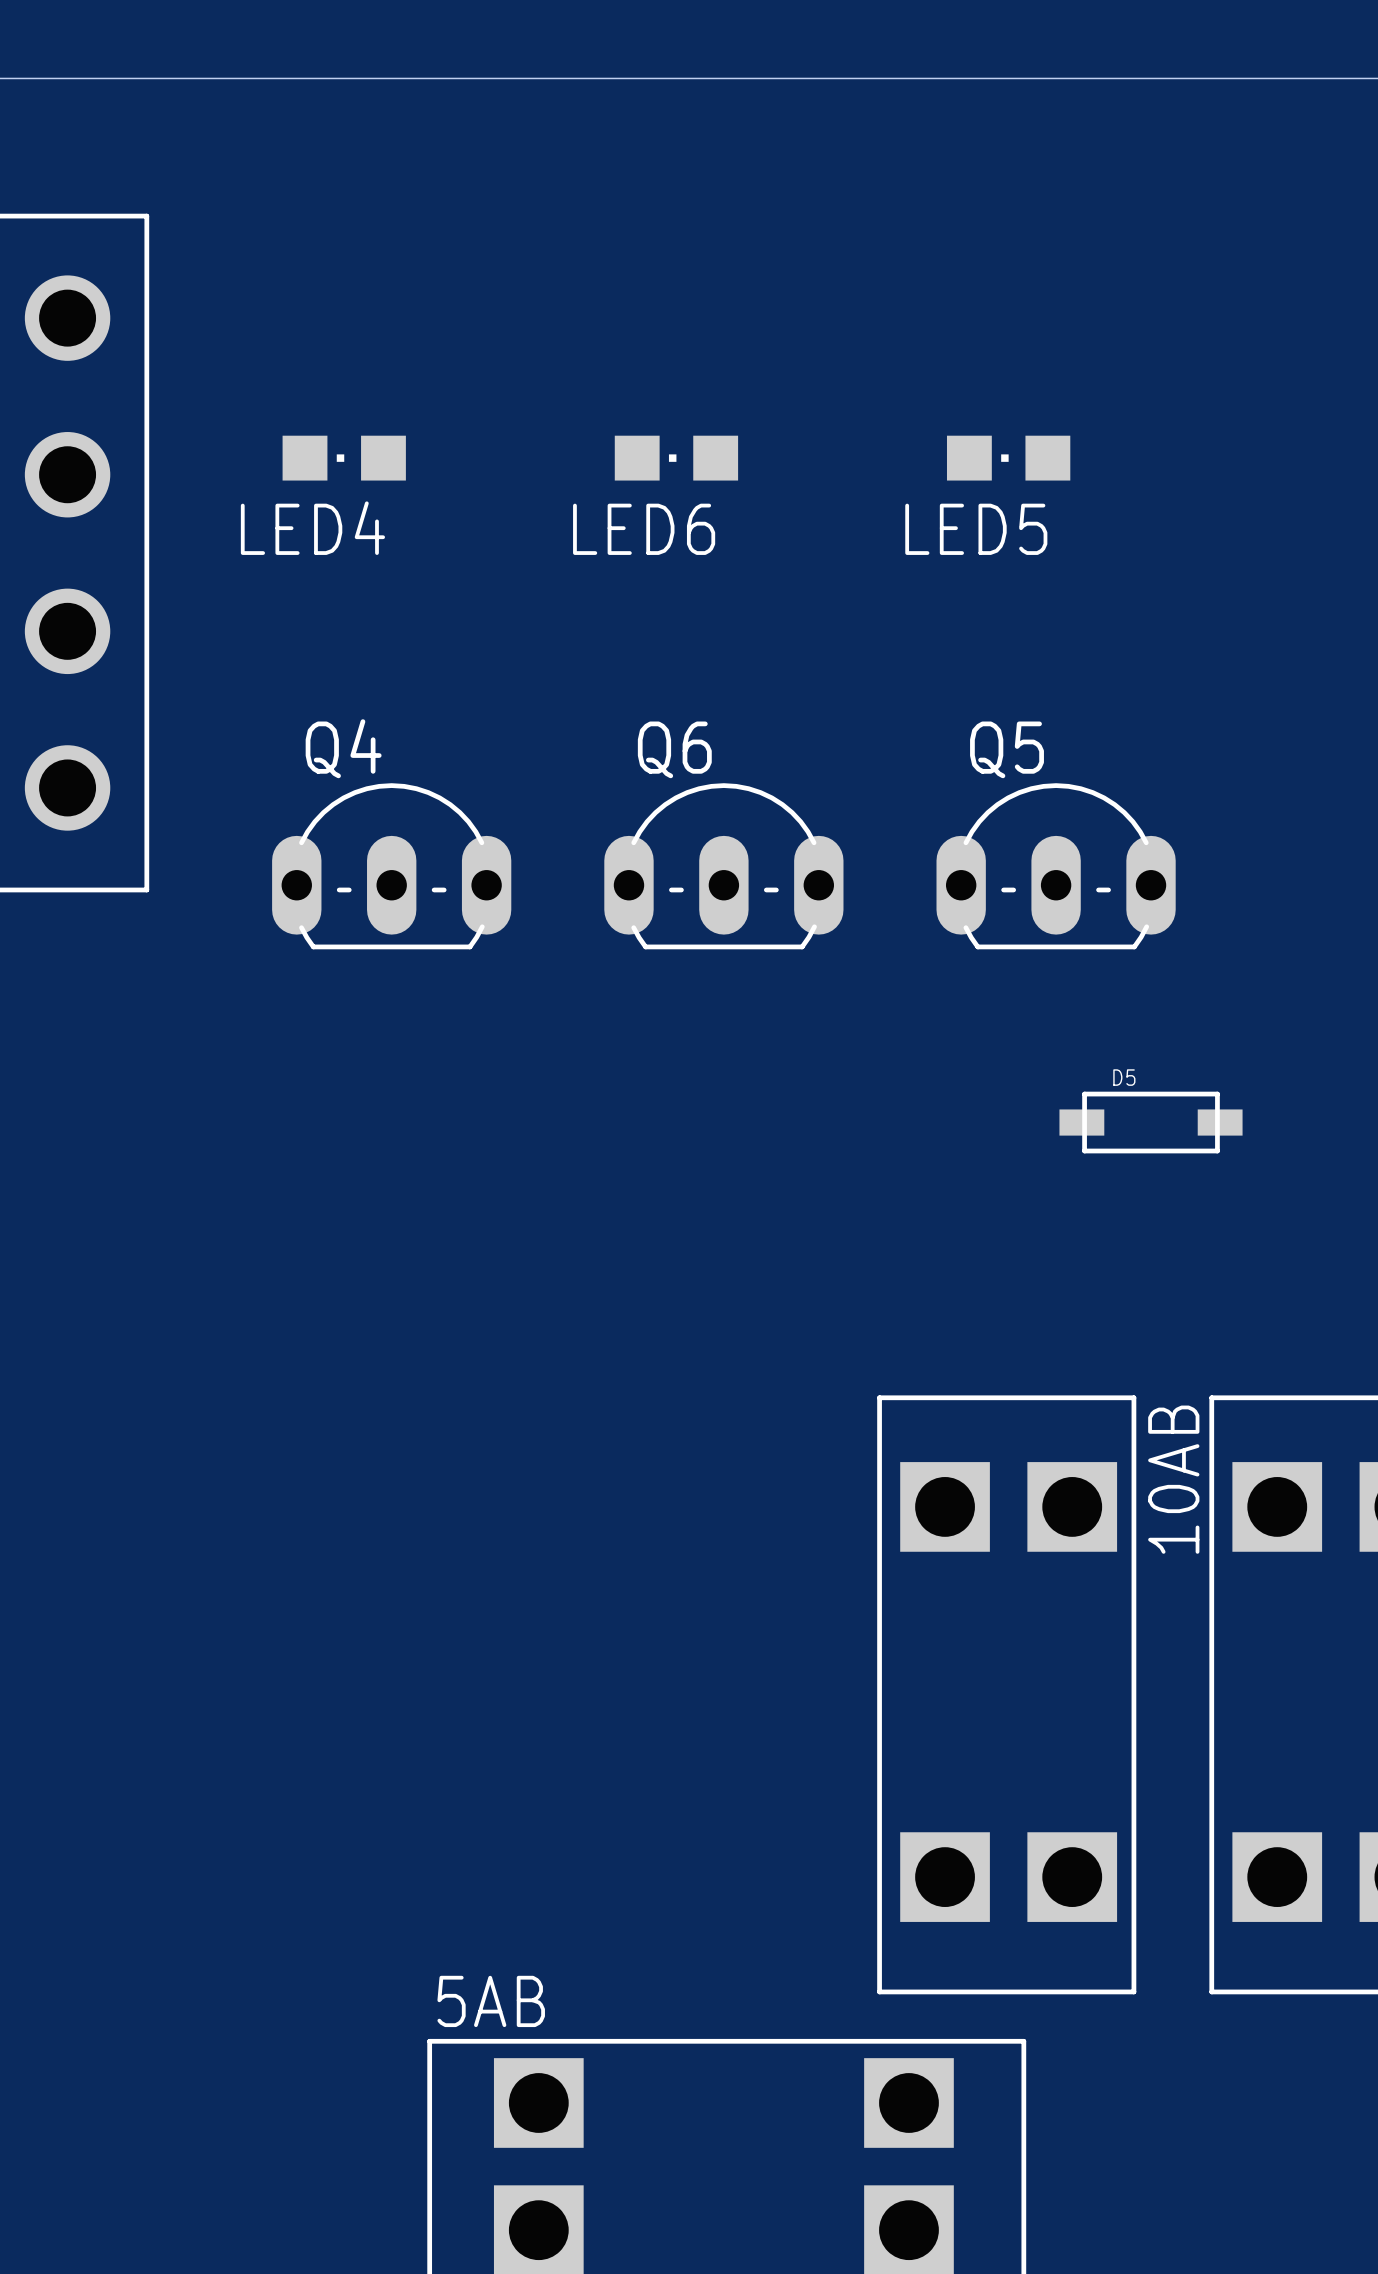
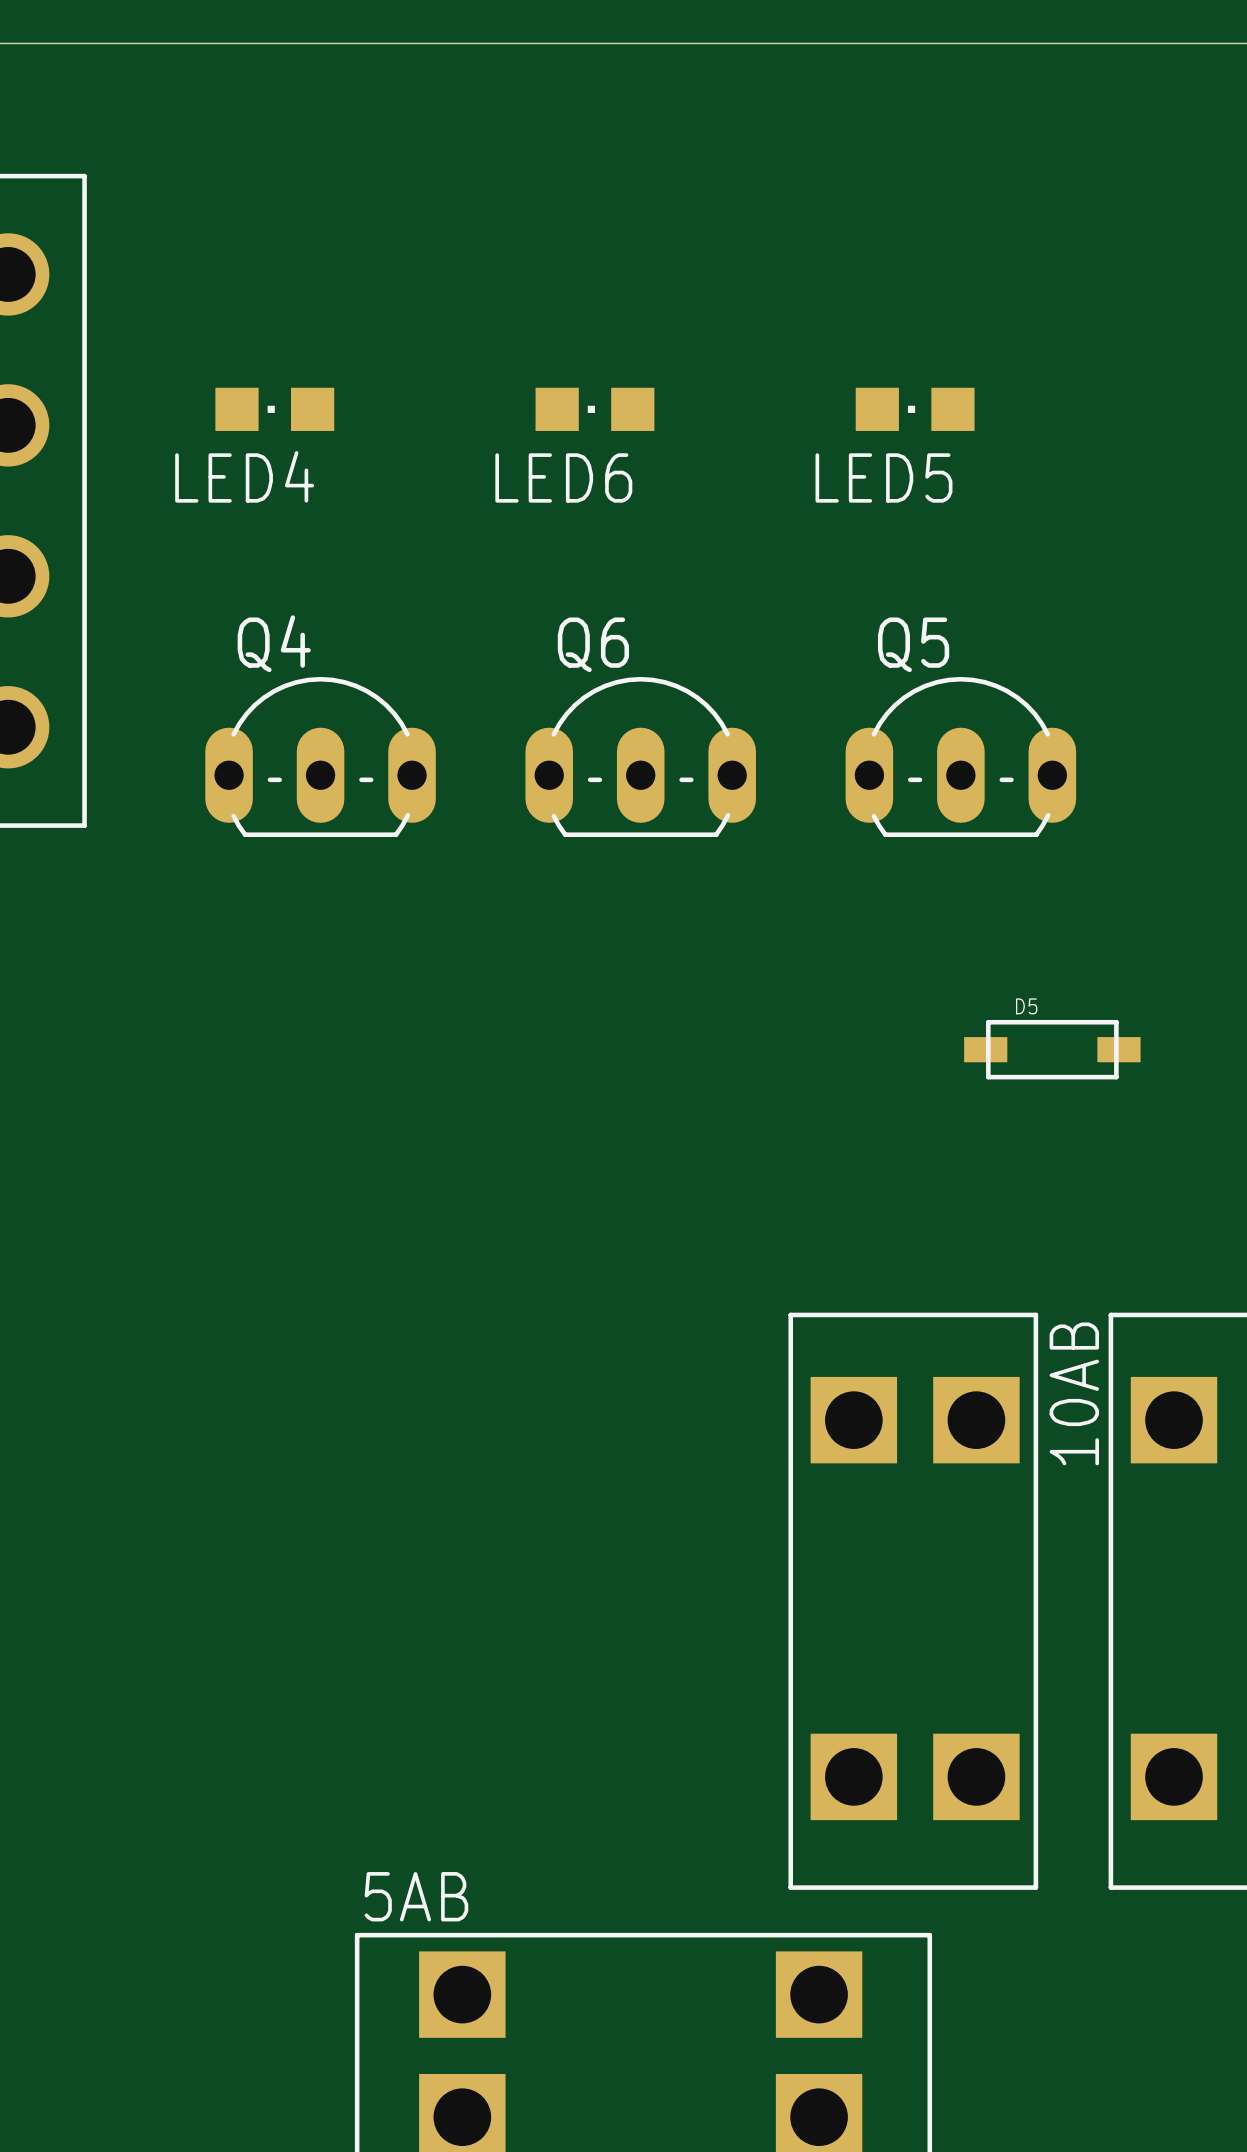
Q4 position: (391, 866) -> (320, 756)
Q6 position: (723, 866) -> (640, 756)
Q5 position: (1056, 866) -> (960, 756)

